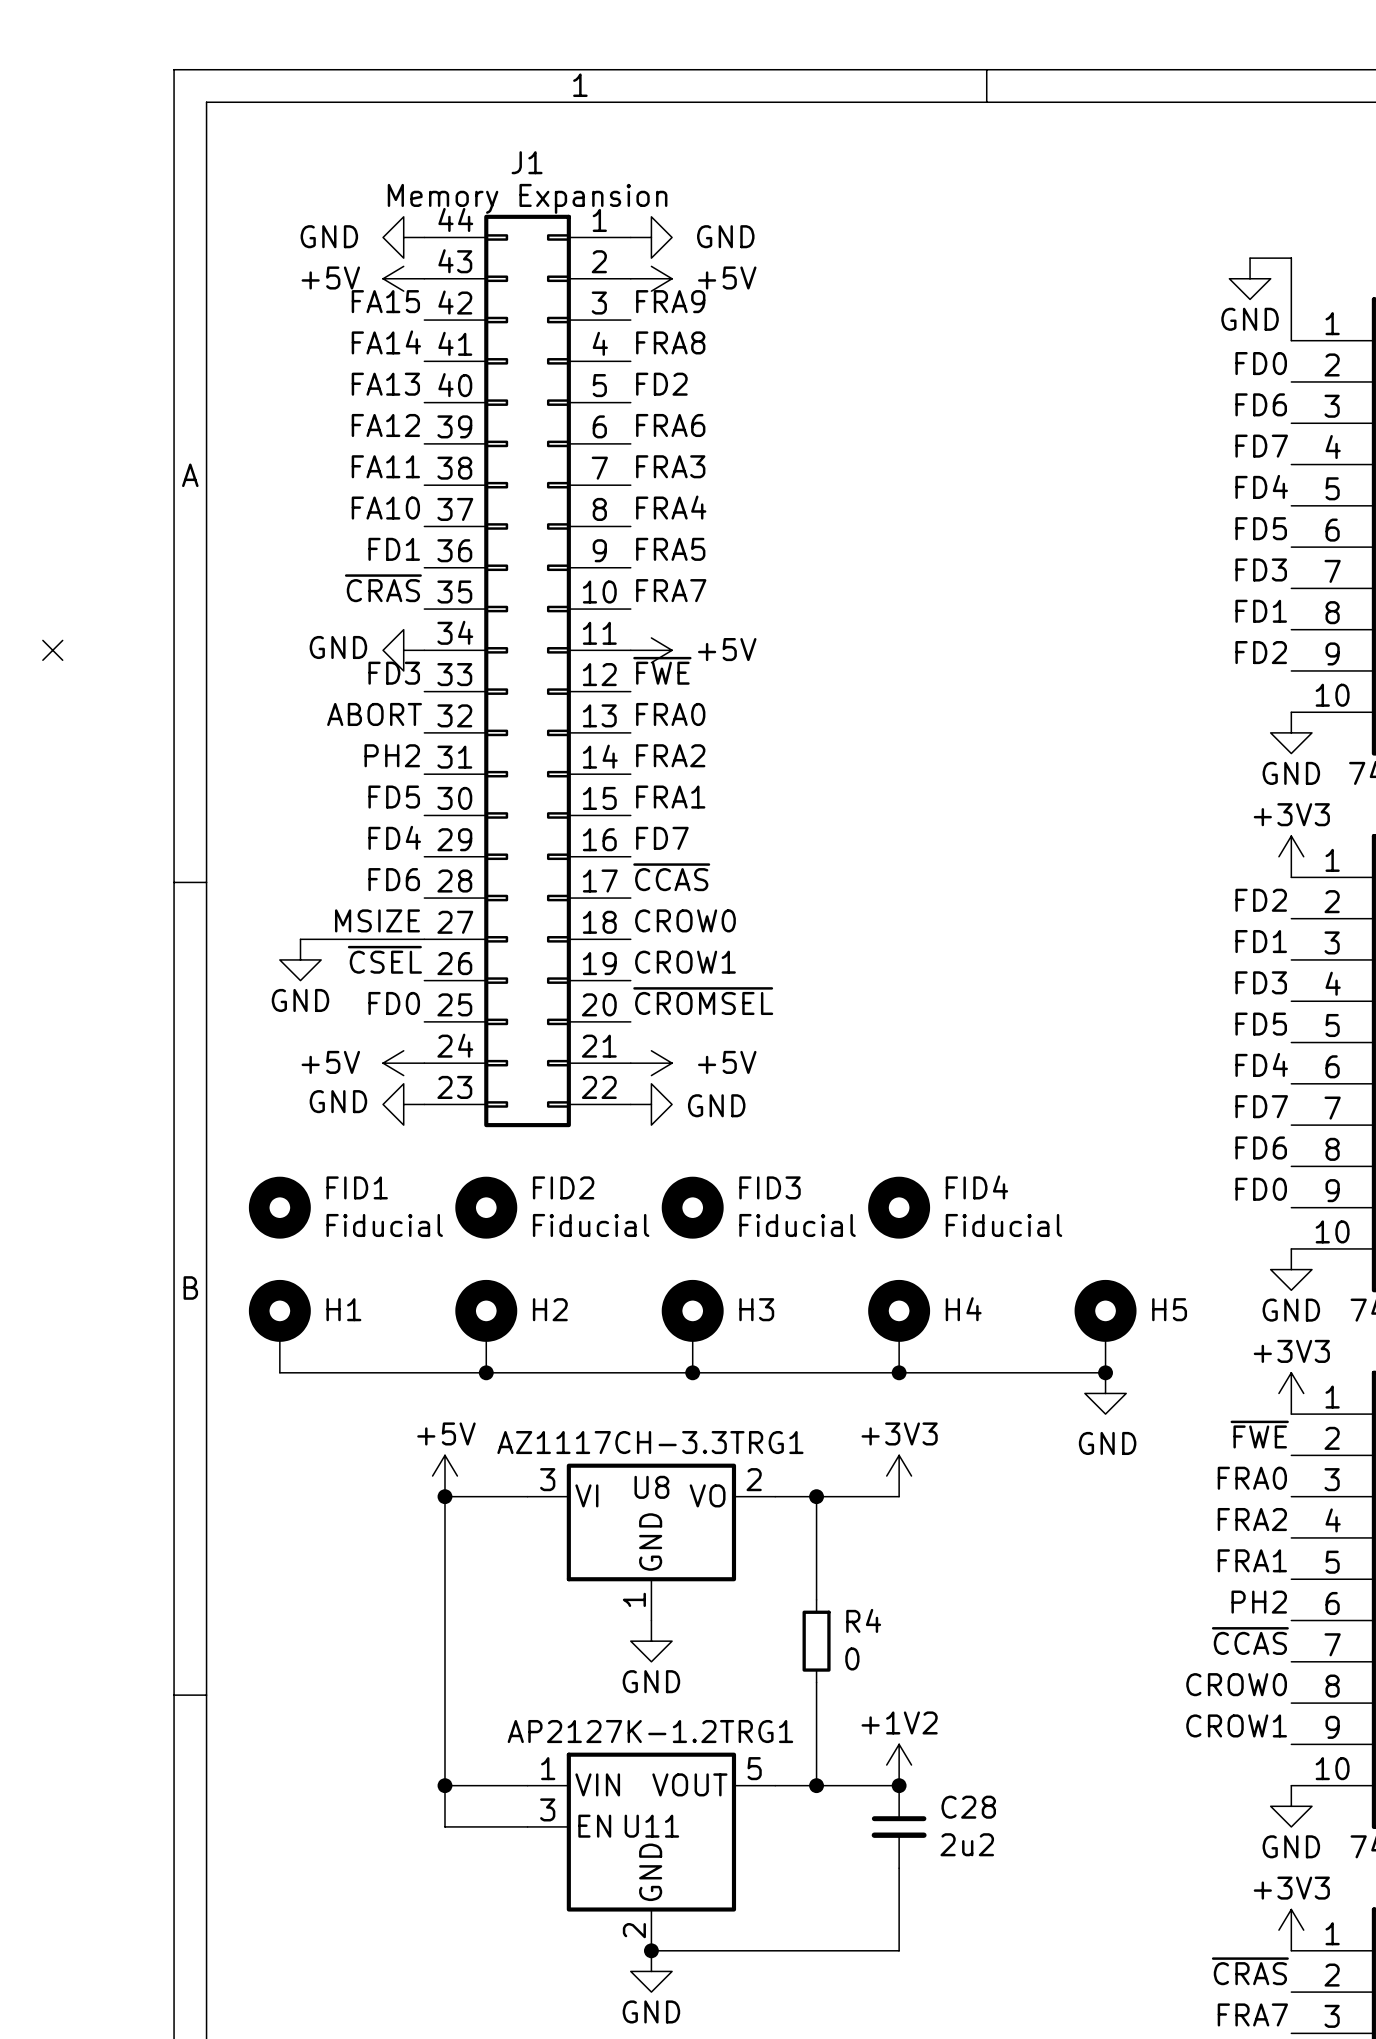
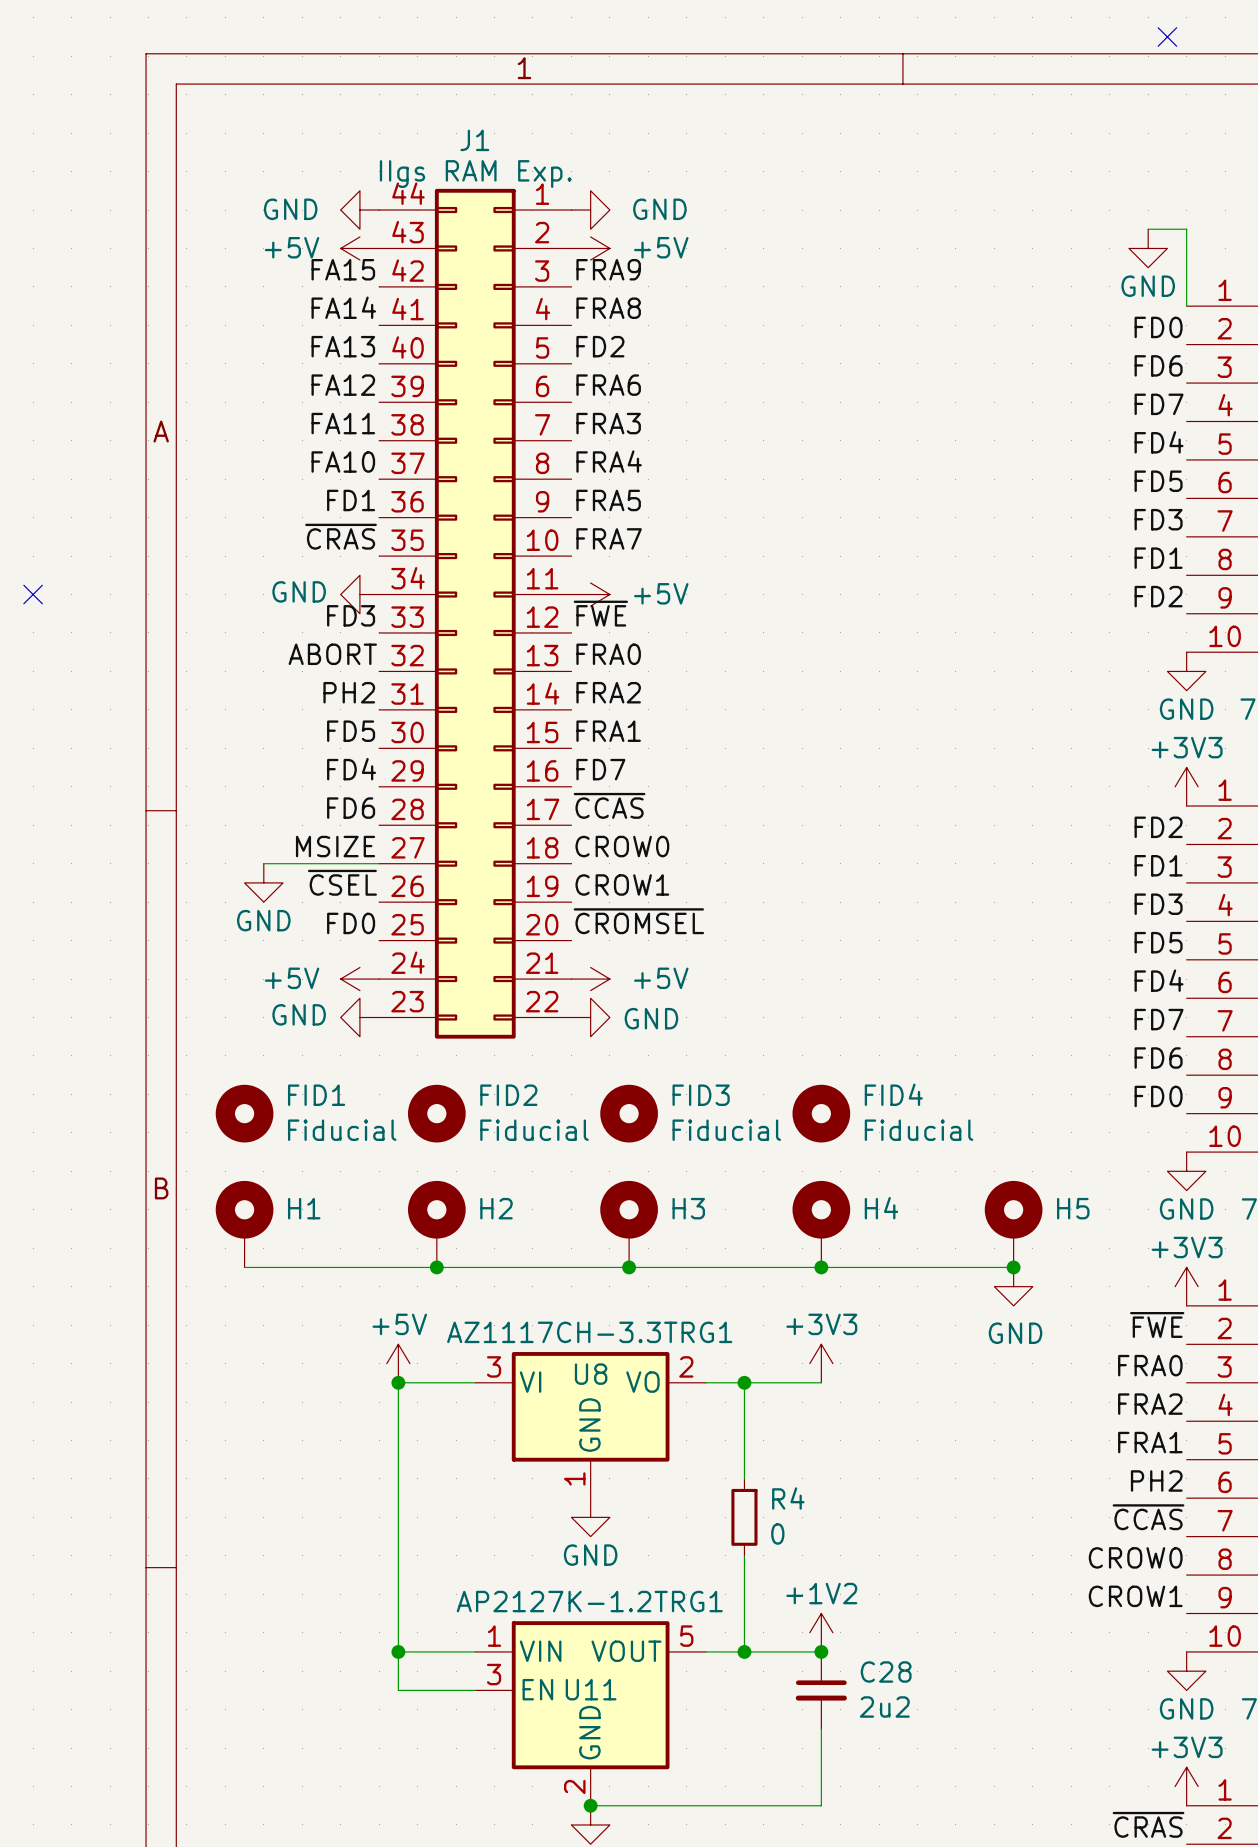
no-connect mark: none -> (1167, 36)
J1 value: Memory Expansion (527, 198) -> IIgs RAM Exp. (475, 174)

